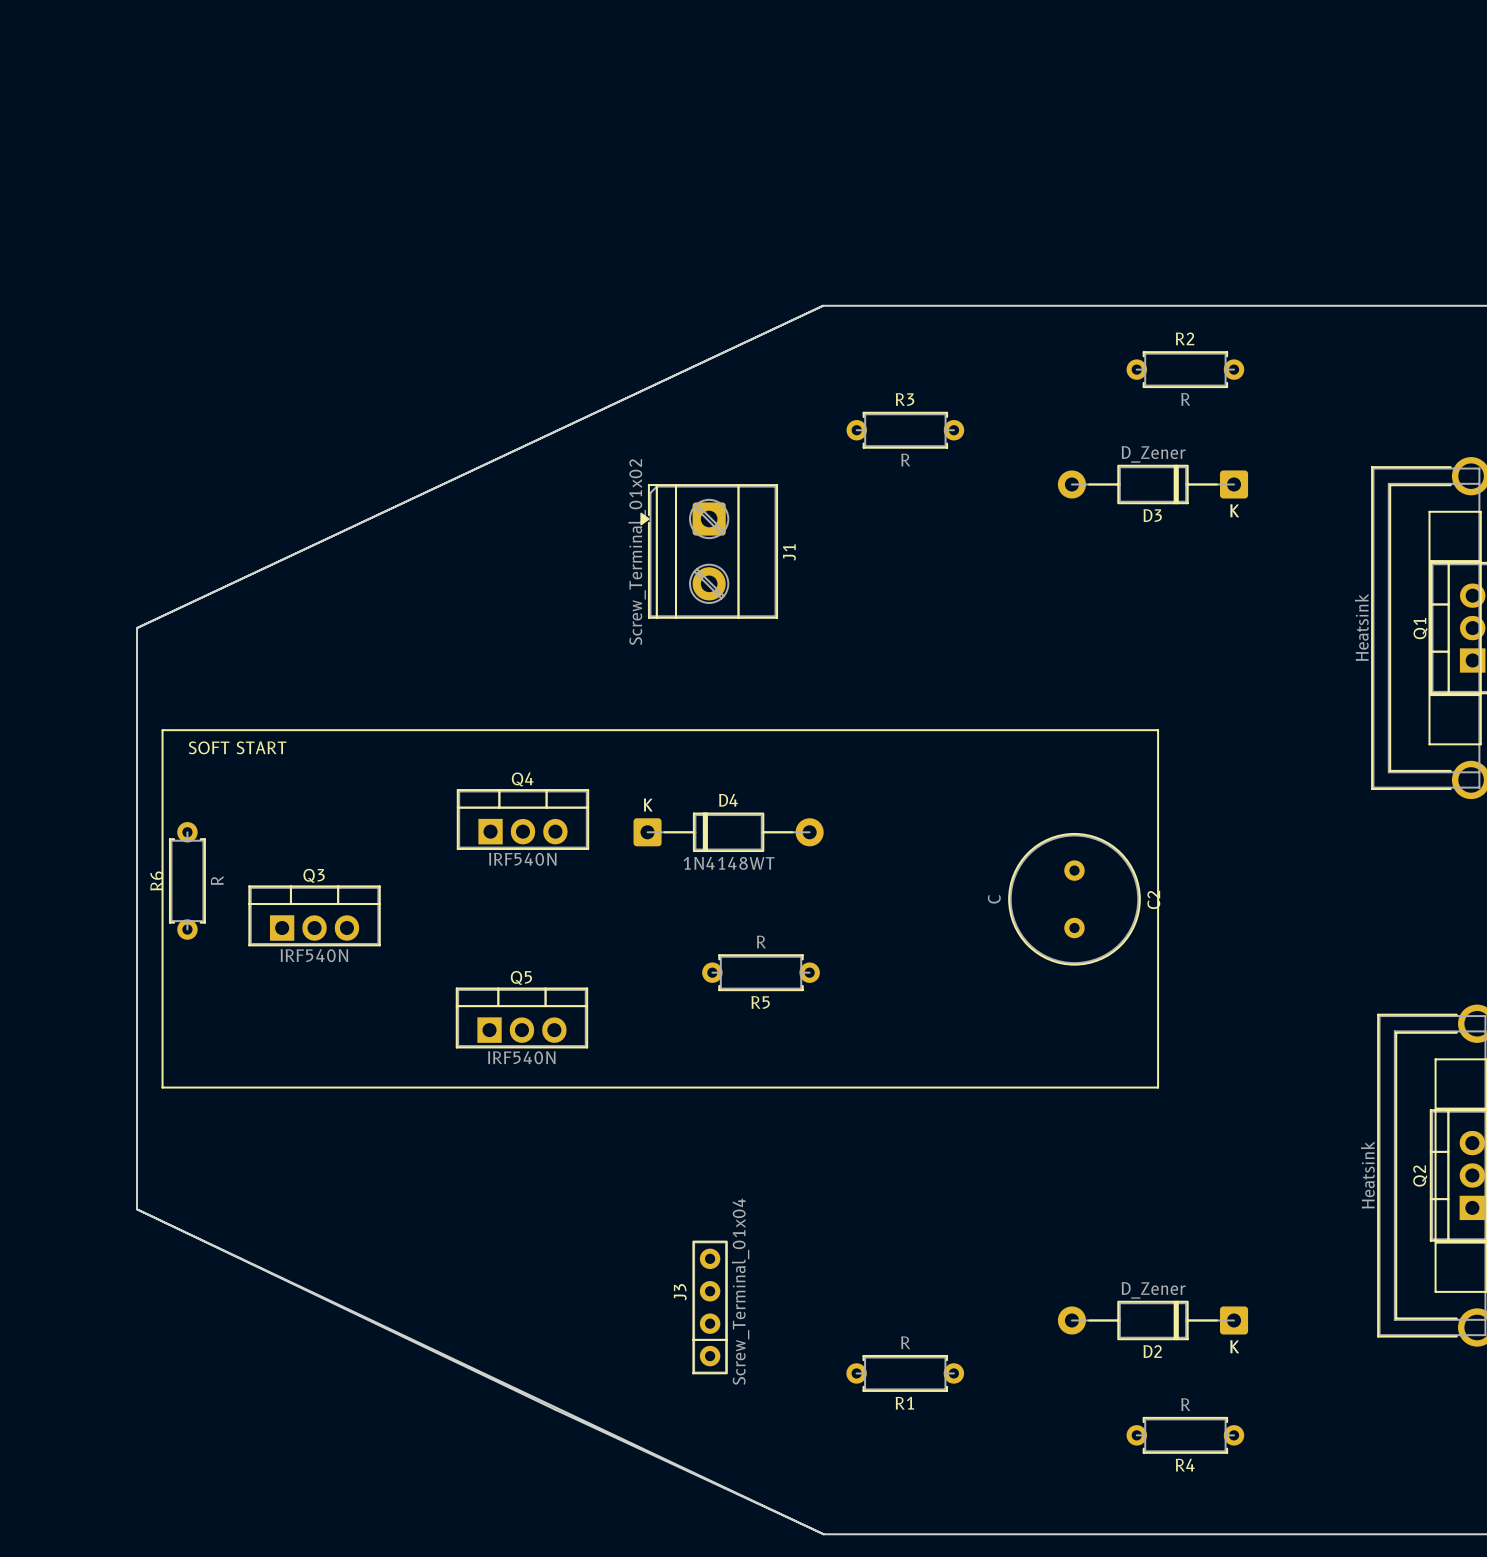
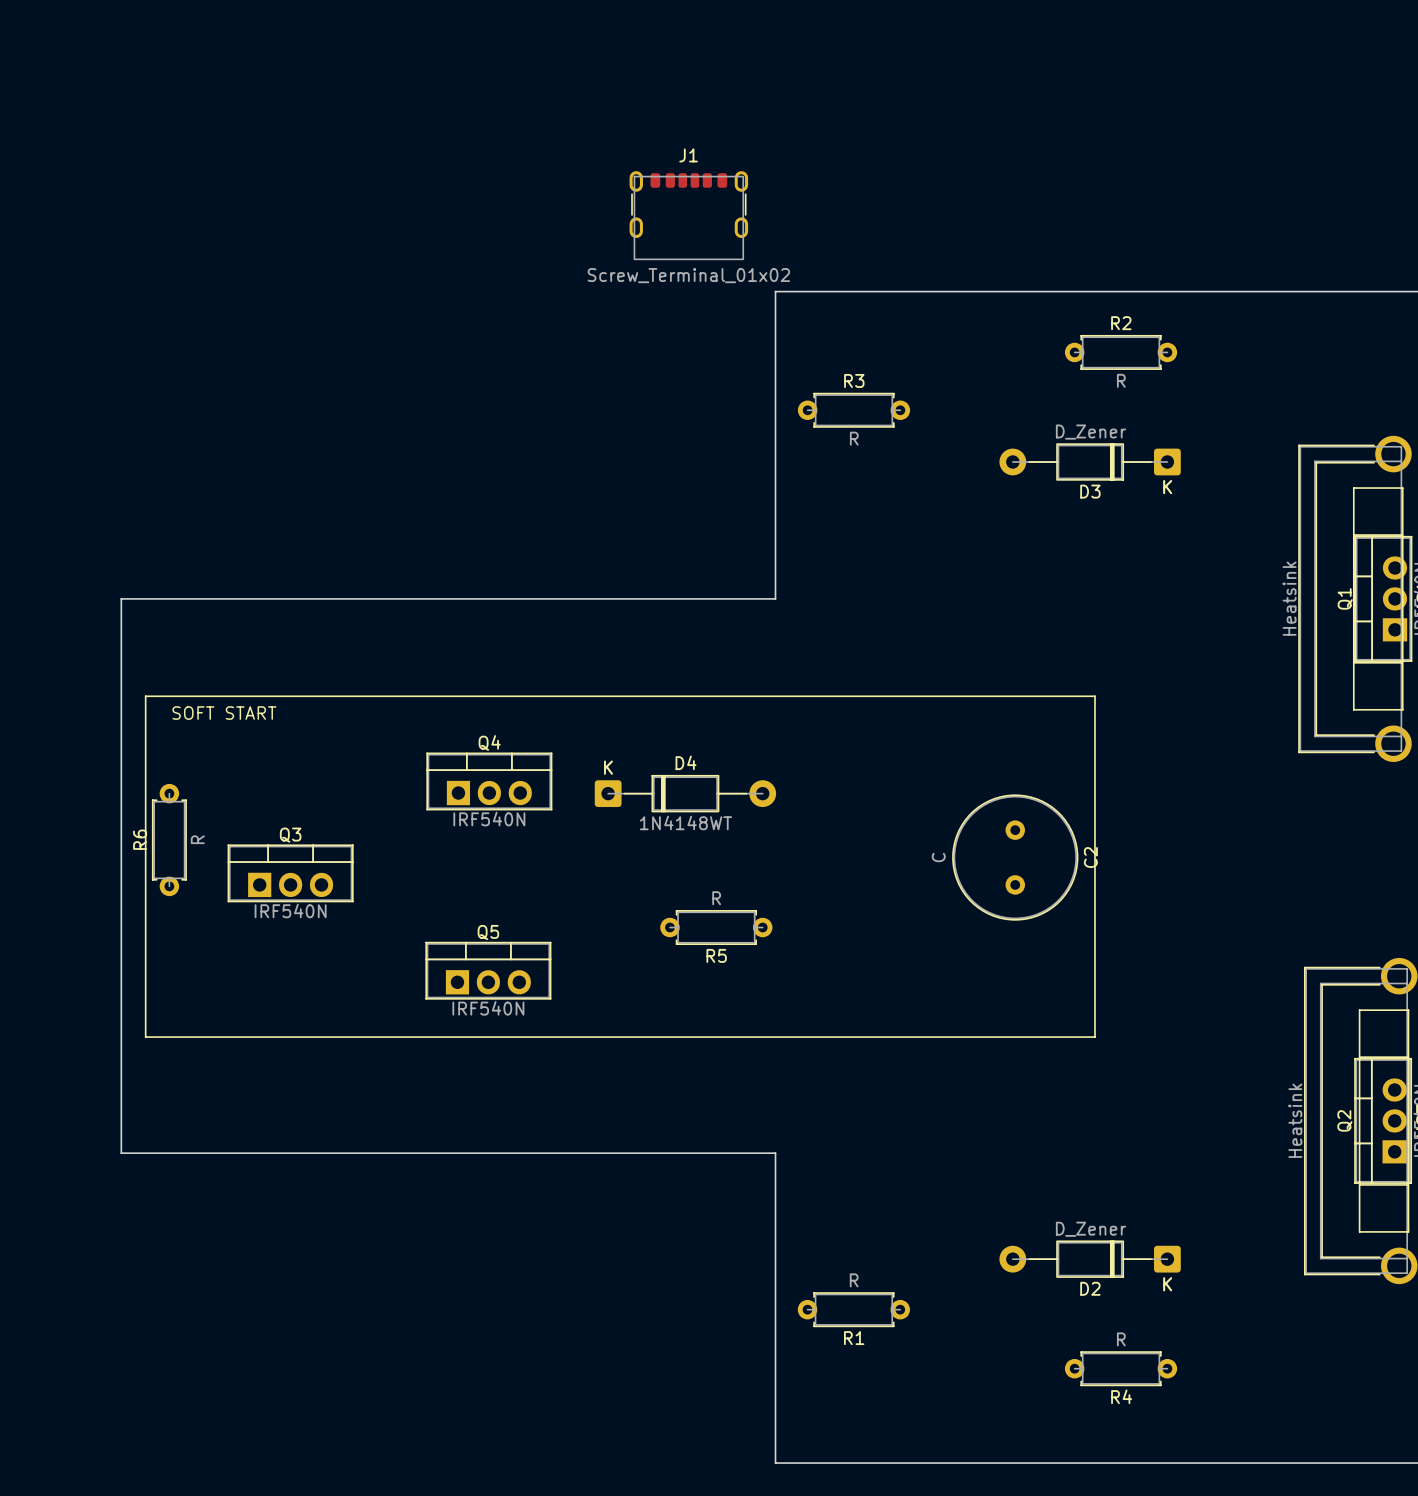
board edge: (823, 305) (392, 508) (137, 628) (823, 305) -> (121, 598) (775, 598) (775, 291)
J1 footprint: [640, 484, 778, 619] -> [629, 171, 749, 260]
J1 value position: Screw_Terminal_01x02 (637, 552) -> Screw_Terminal_01x02 (688, 275)
J1 name position: J1 (789, 552) -> J1 (688, 155)
board edge: (137, 1209) (823, 1534) (555, 1409) (137, 1209) -> (121, 1153) (775, 1153) (776, 1463)
J3: Screw_Terminal_01x04 (710, 1307) -> none

